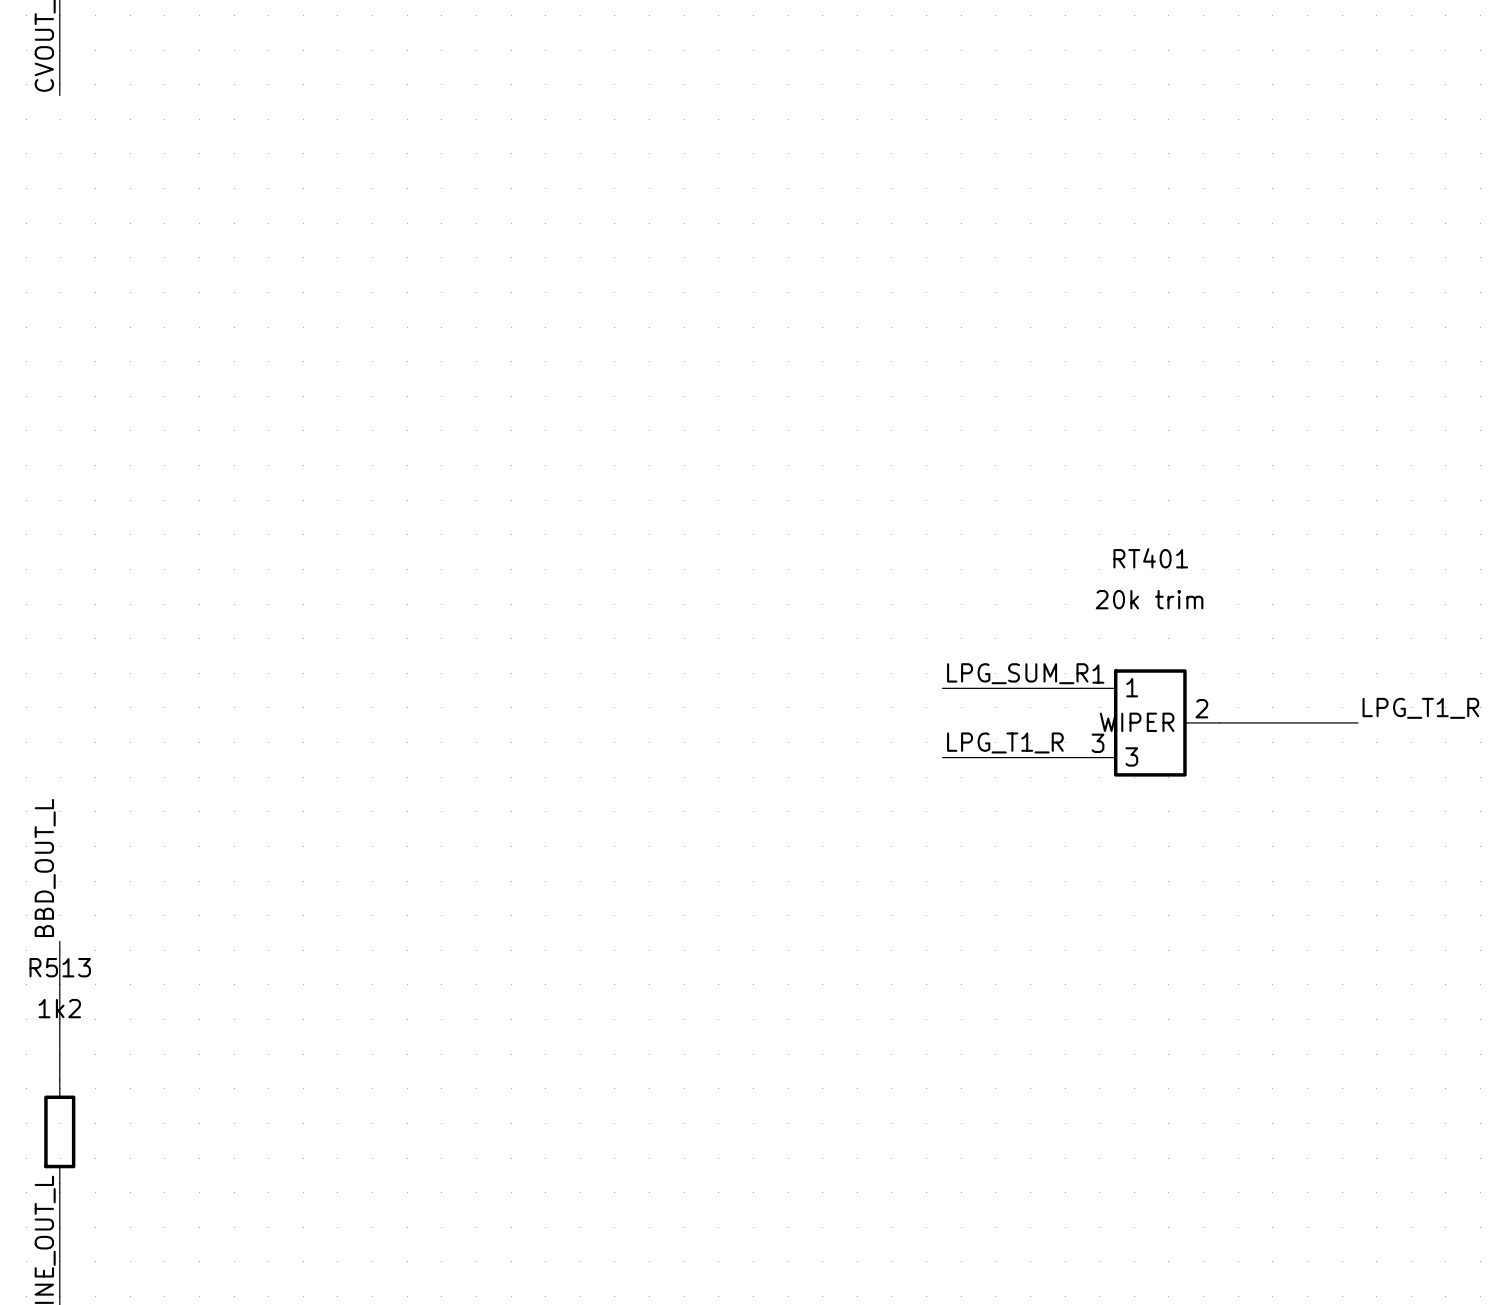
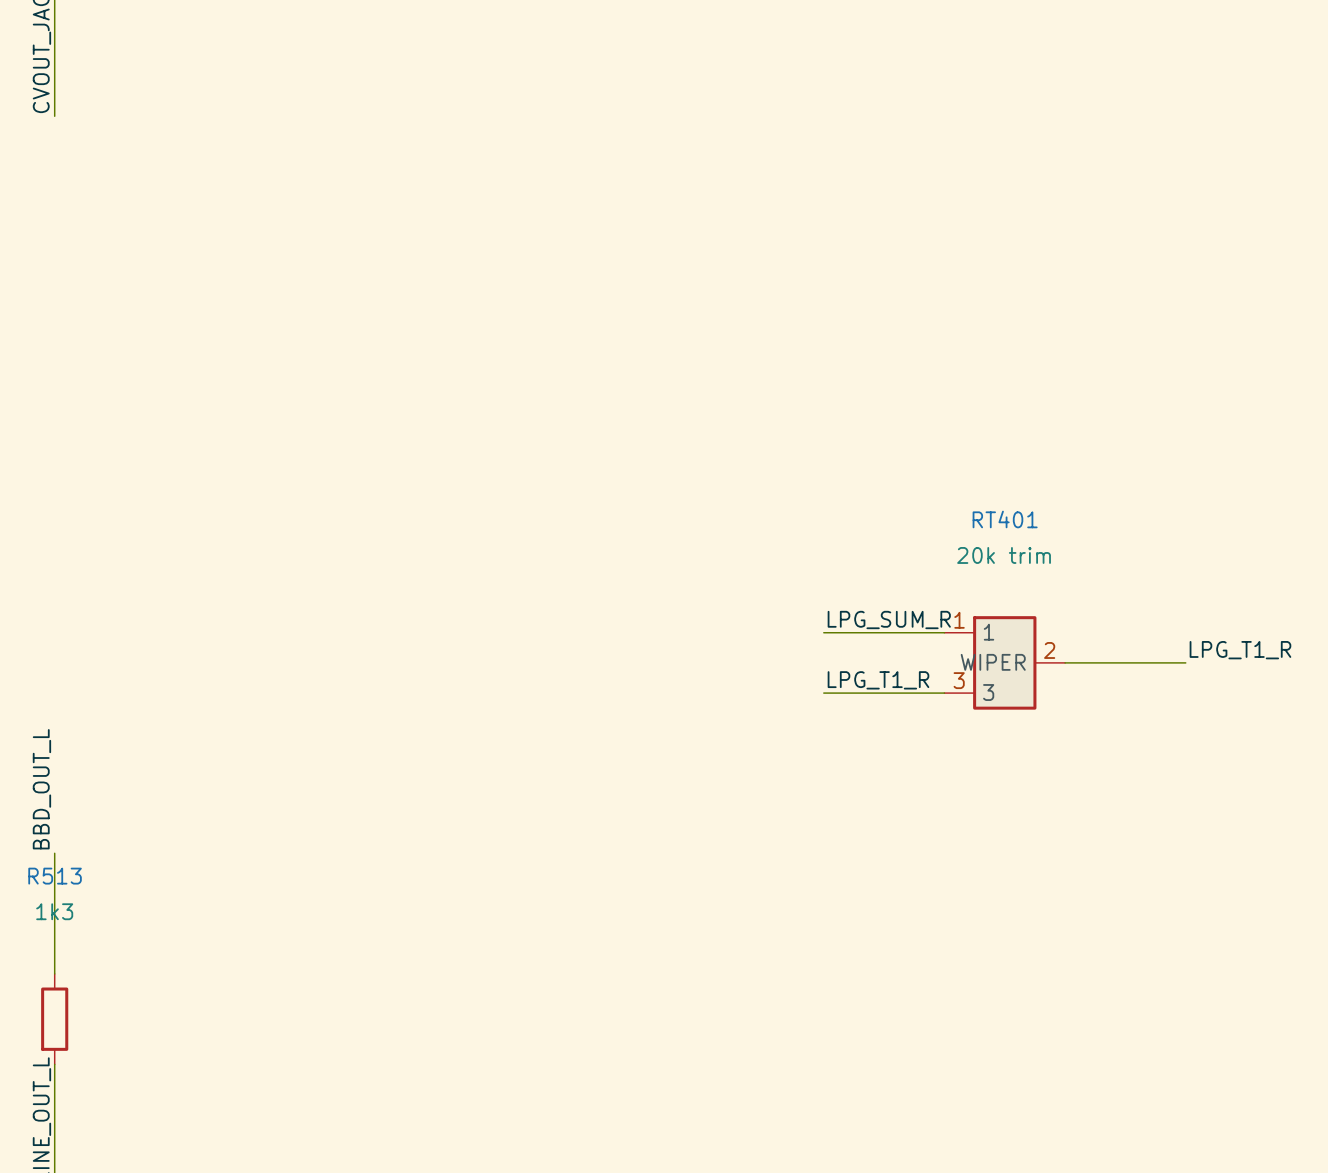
R513 value: 1k2 (59, 1008) -> 1k3 (54, 911)

